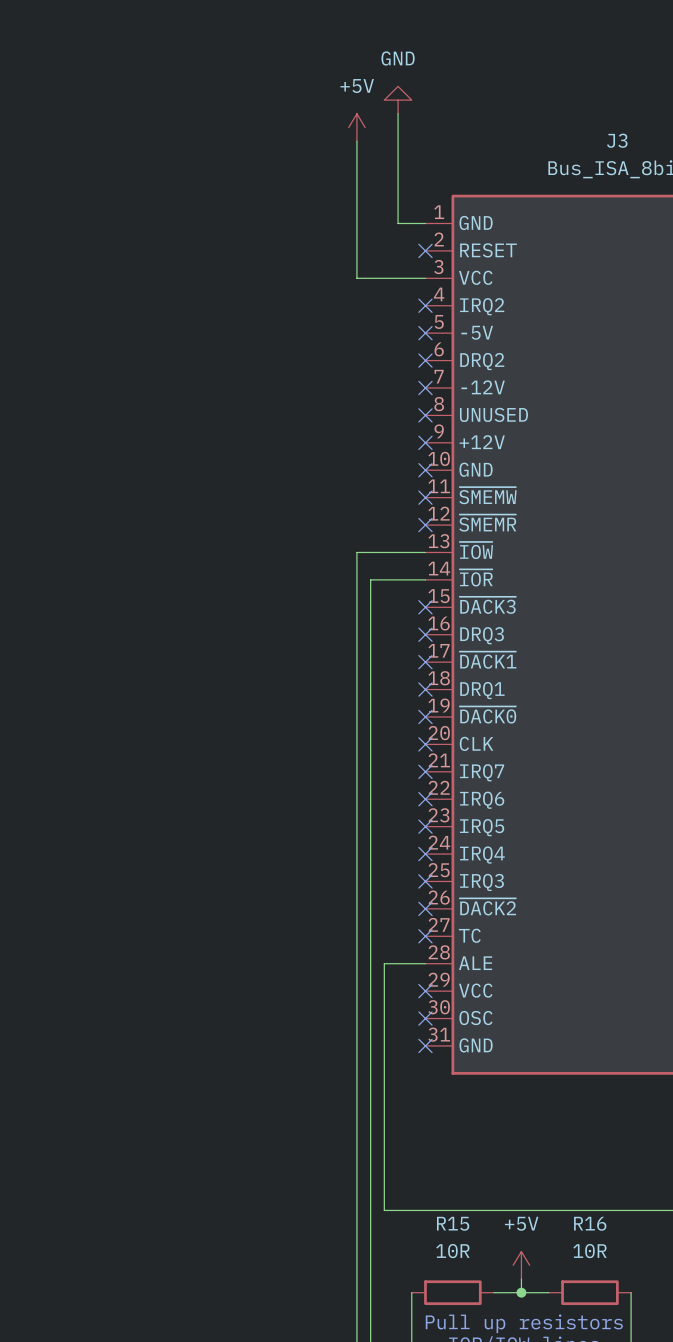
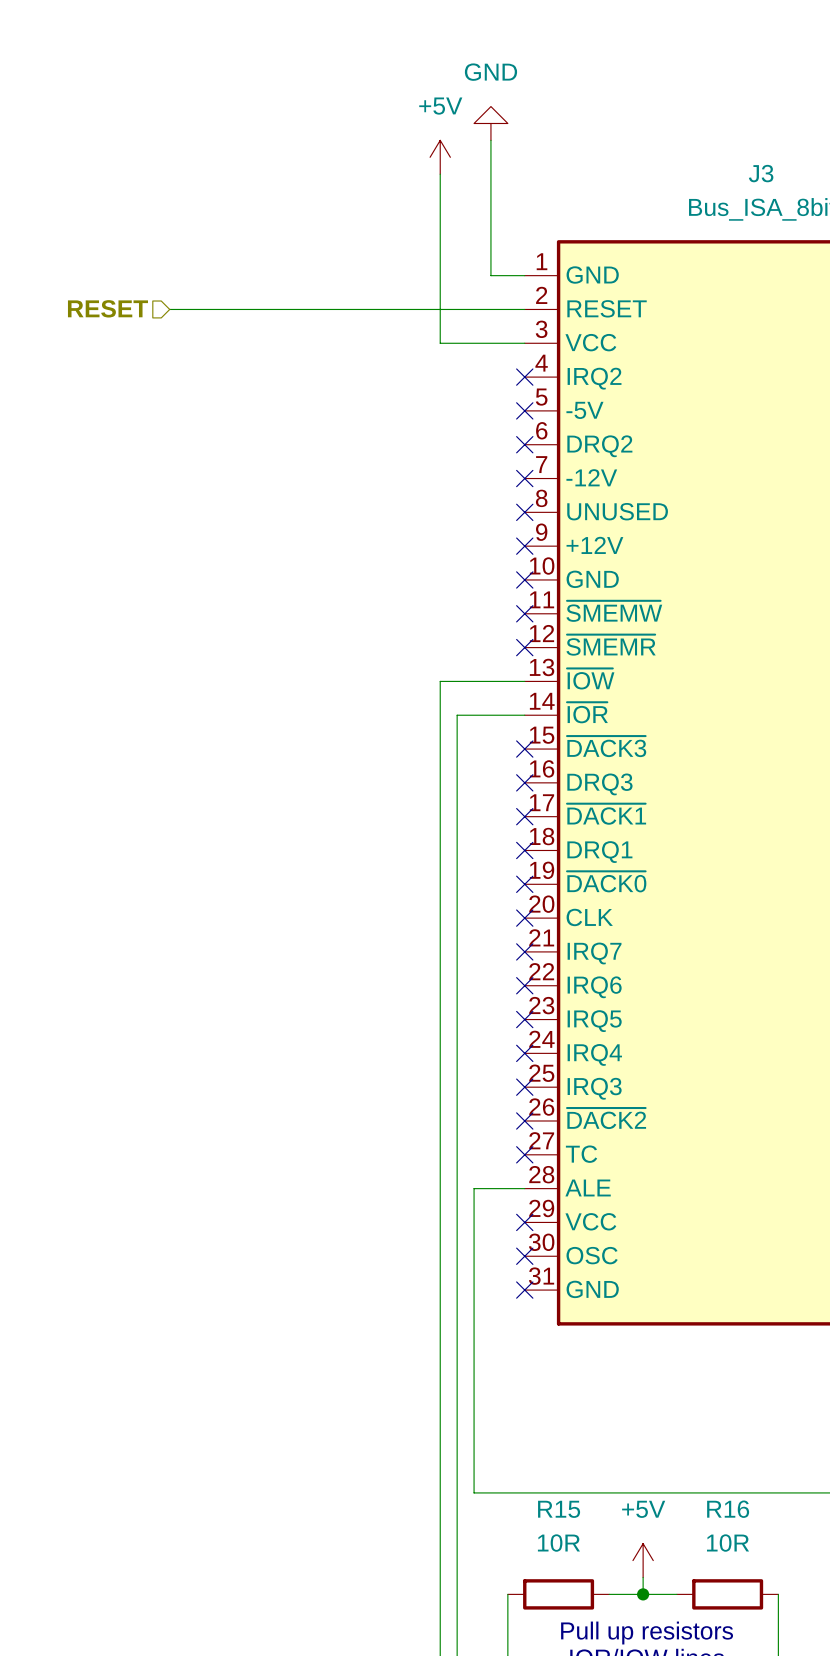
hierarchical label: none -> RESET (107, 308)
wire: none -> (169, 309) (524, 309)
no-connect mark: (425, 250) -> none

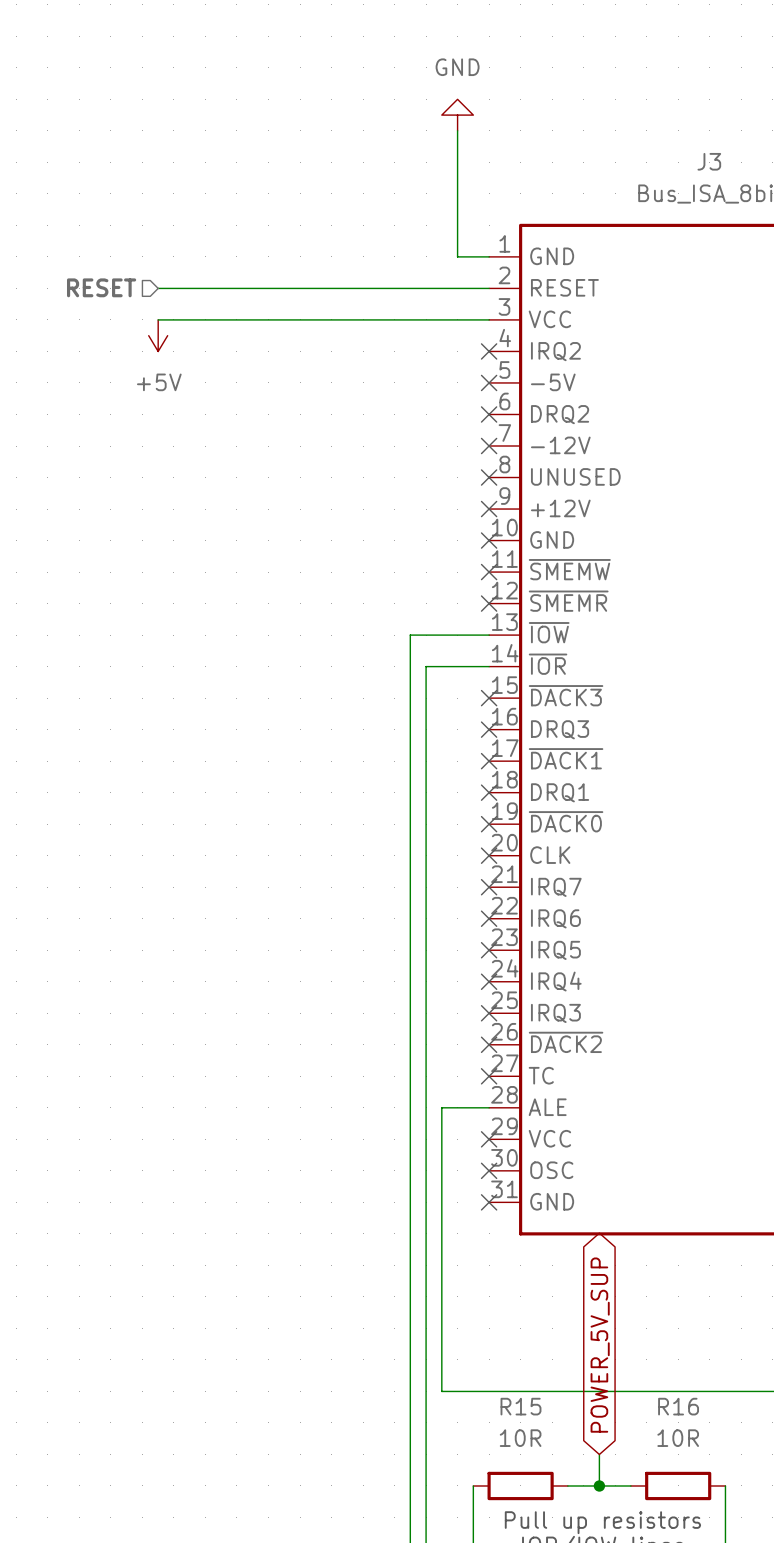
power symbol: +5V (440, 157) -> none
wire: (440, 174) (440, 343) -> (158, 319) (410, 319)
power symbol: none -> +5V (158, 335)
global label: none -> POWER_5V_SUP (600, 1345)
power symbol: +5V (643, 1560) -> none

